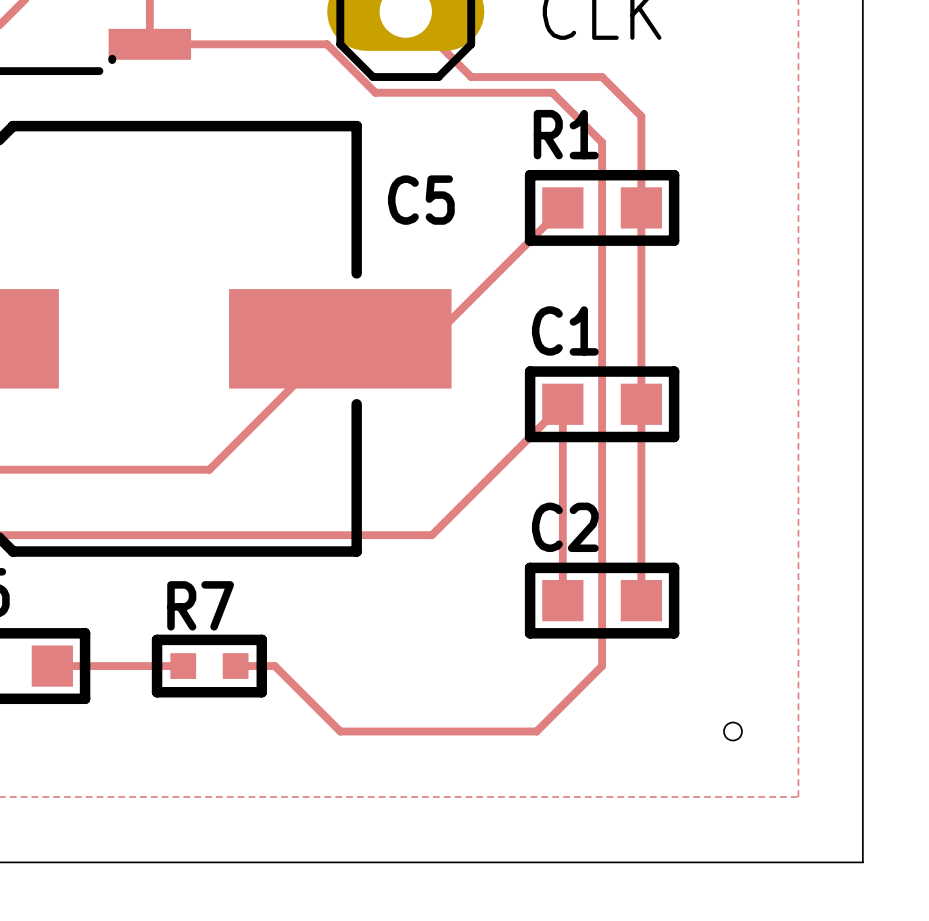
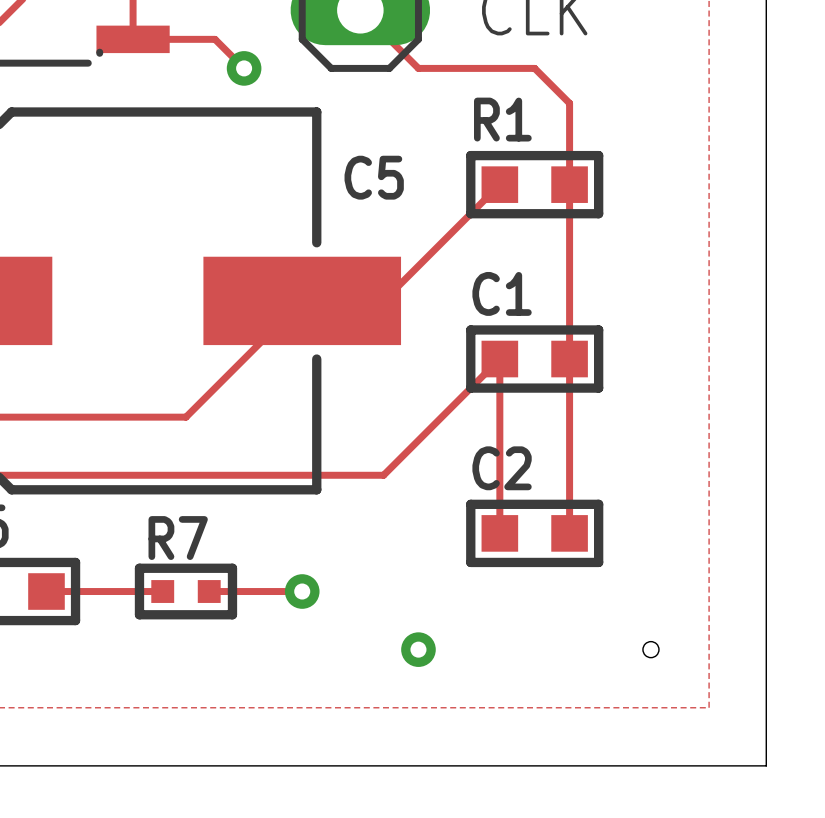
track: (242, 44) (327, 44) (375, 92) (552, 92) (602, 142) (602, 666) (536, 731) (340, 731) (274, 666) -> (215, 39) (244, 68)
via: none -> (244, 68)
track: none -> (244, 591) (302, 591)
via: none -> (302, 591)
via: none -> (418, 649)

